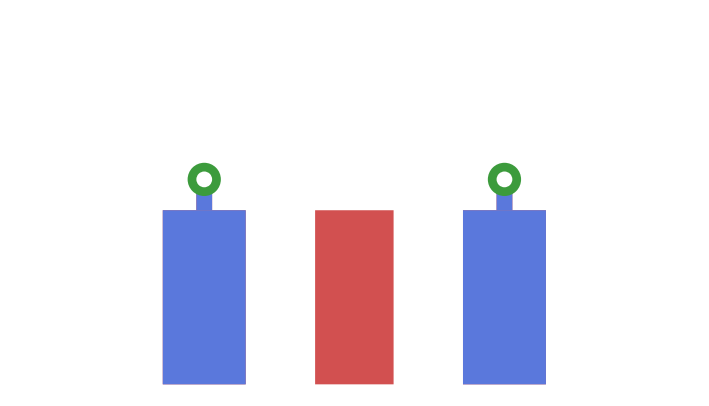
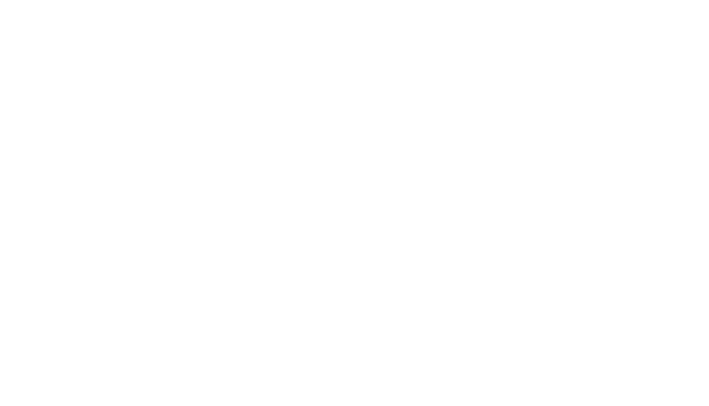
part: (354, 273) -> none

